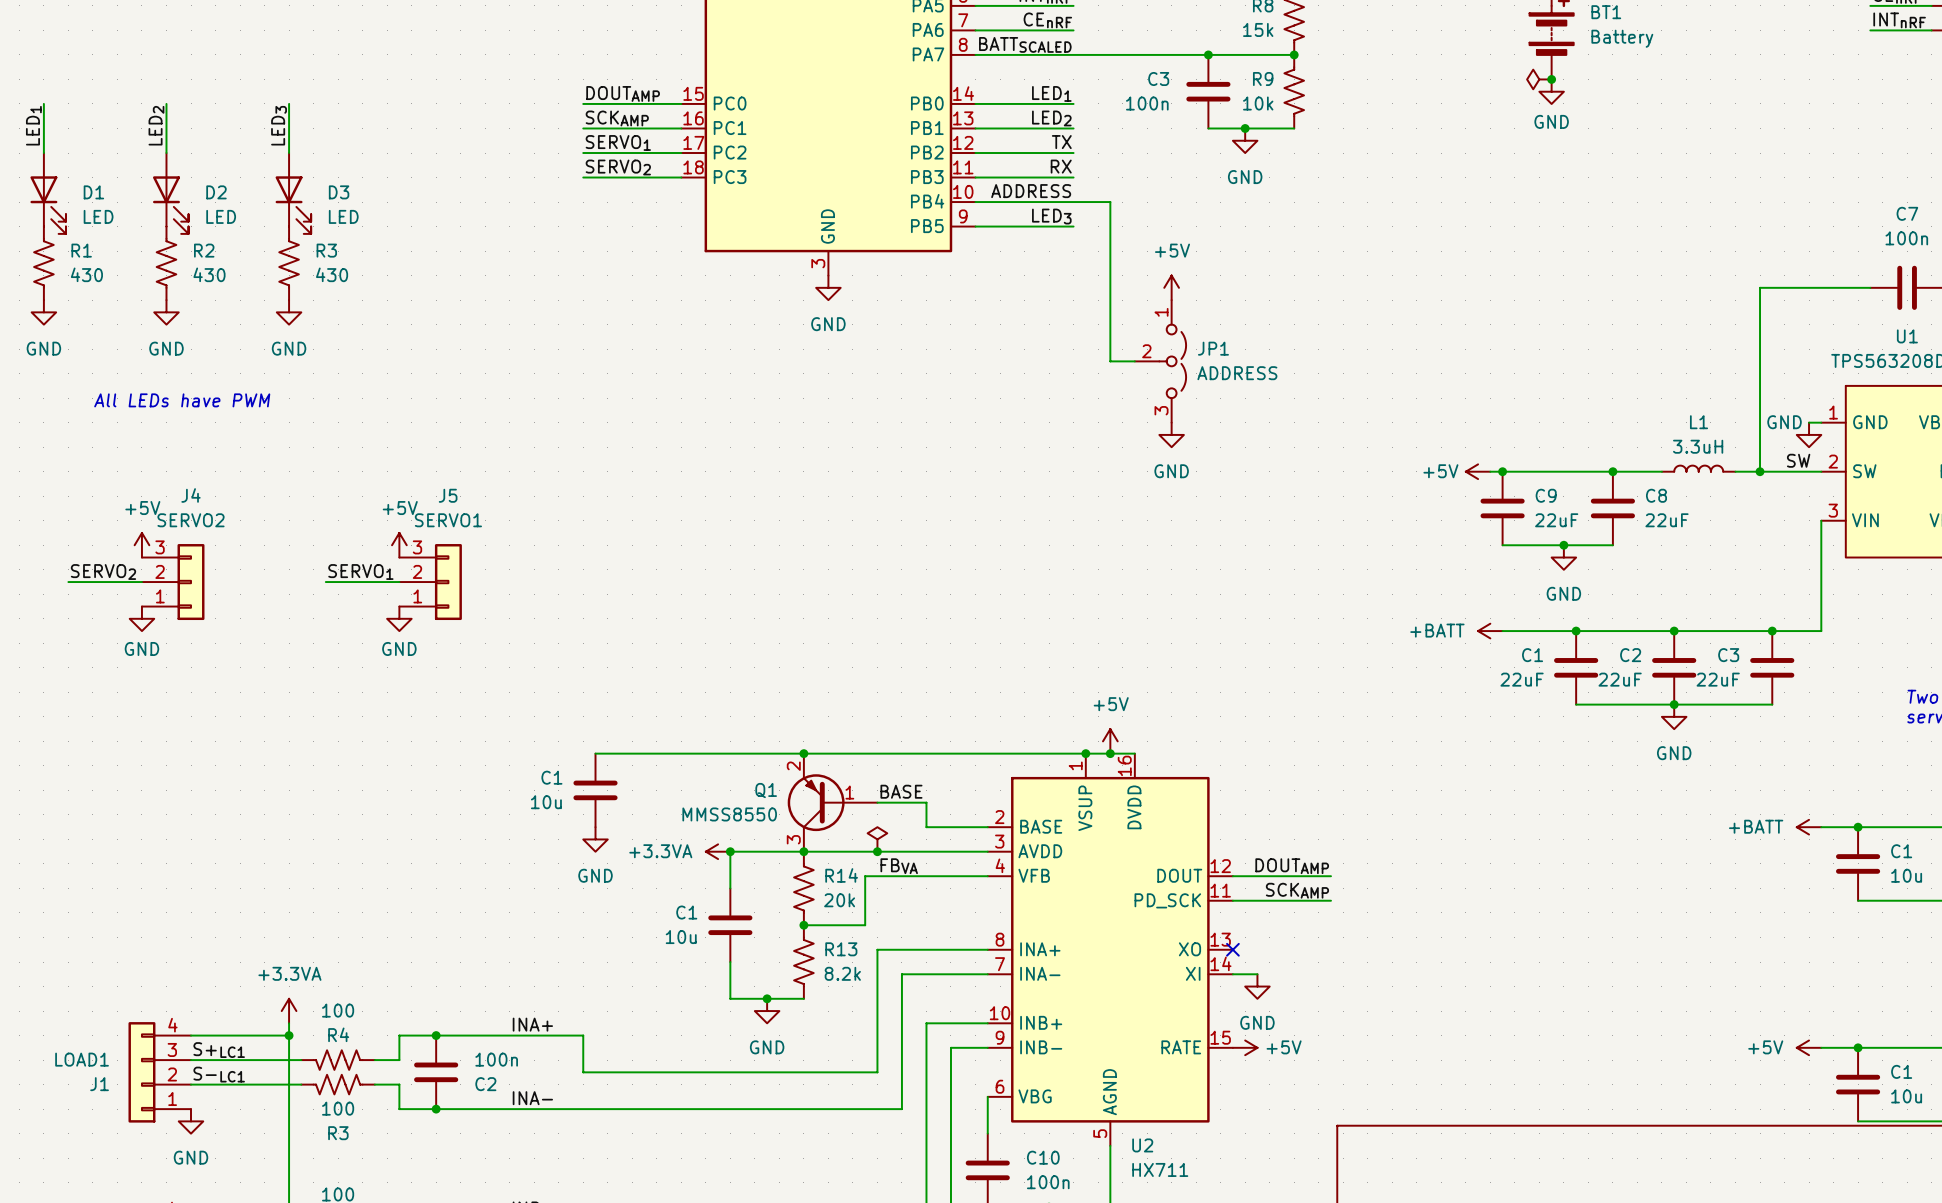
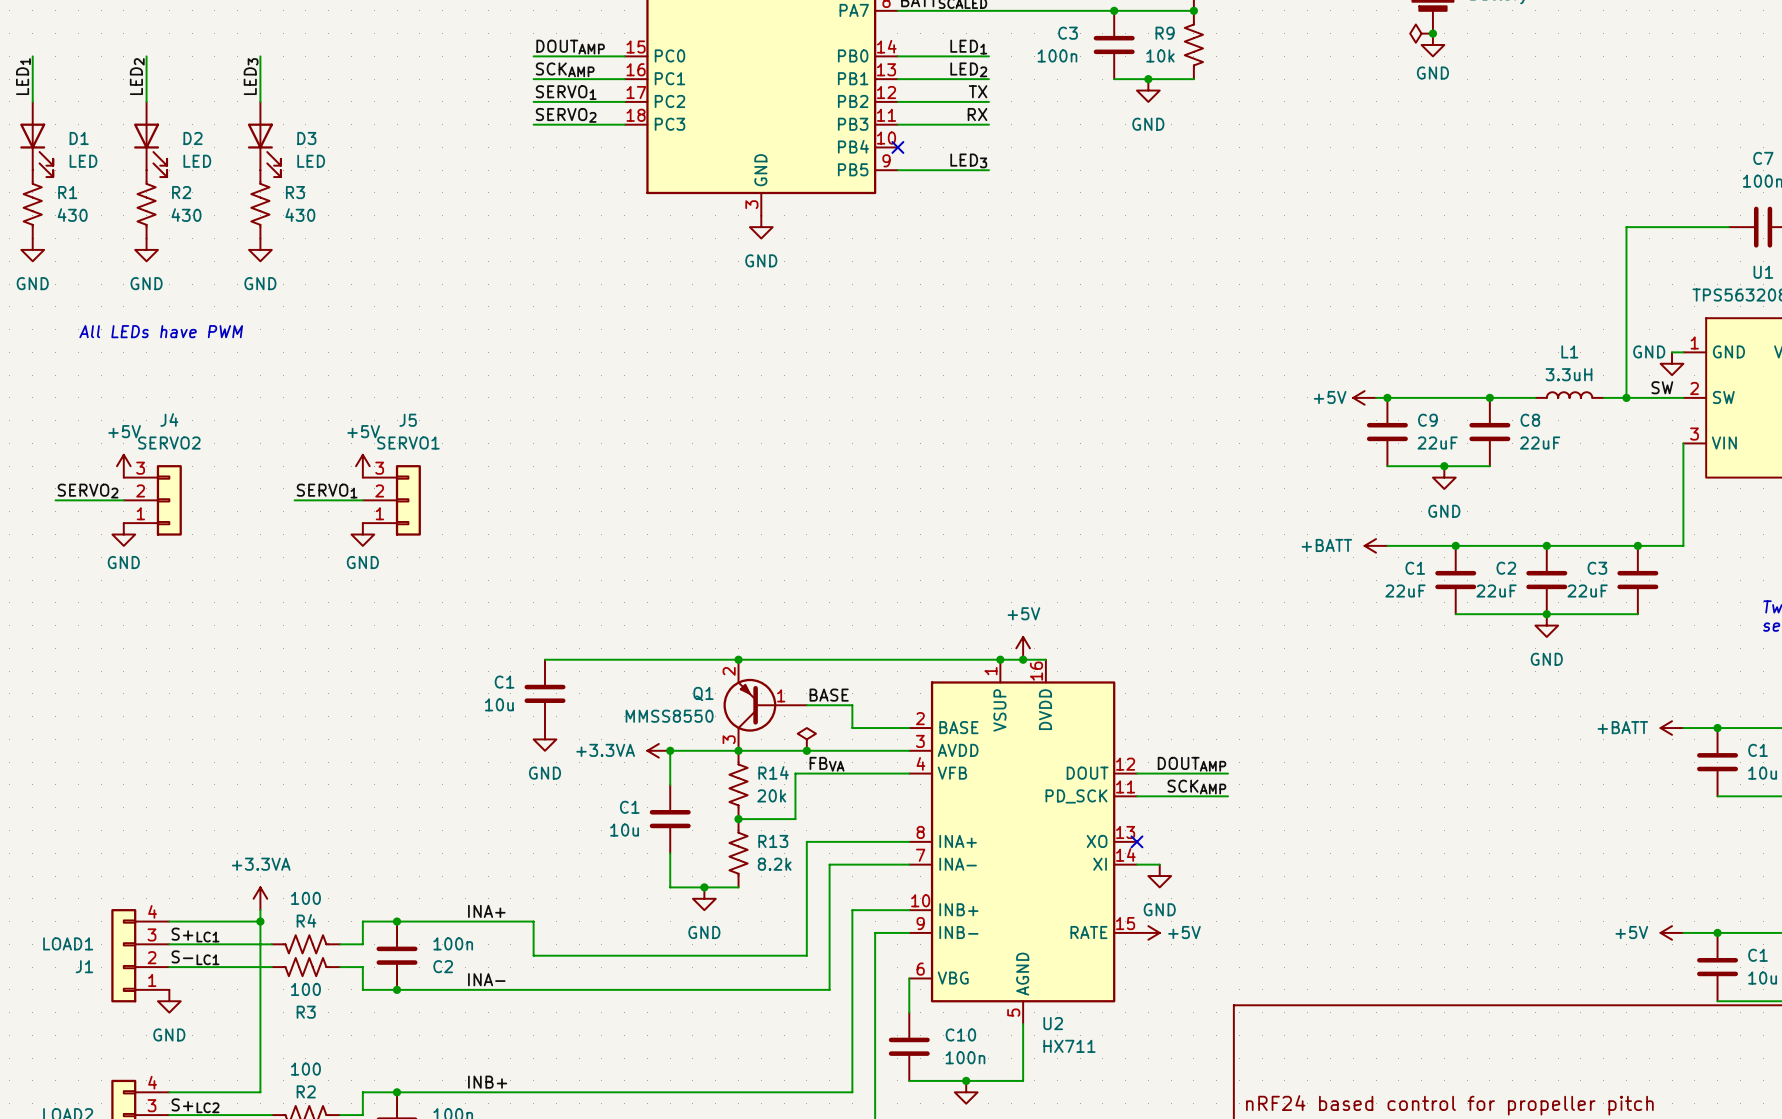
label: ADDRESS (1031, 191) -> none
wire: (975, 202) (1110, 202) (1110, 361) (1134, 361) -> none
no-connect mark: none -> (897, 147)
power symbol: +5V (1171, 287) -> none
JP1: ADDRESS (1160, 361) -> none
power symbol: GND (1171, 434) -> none

